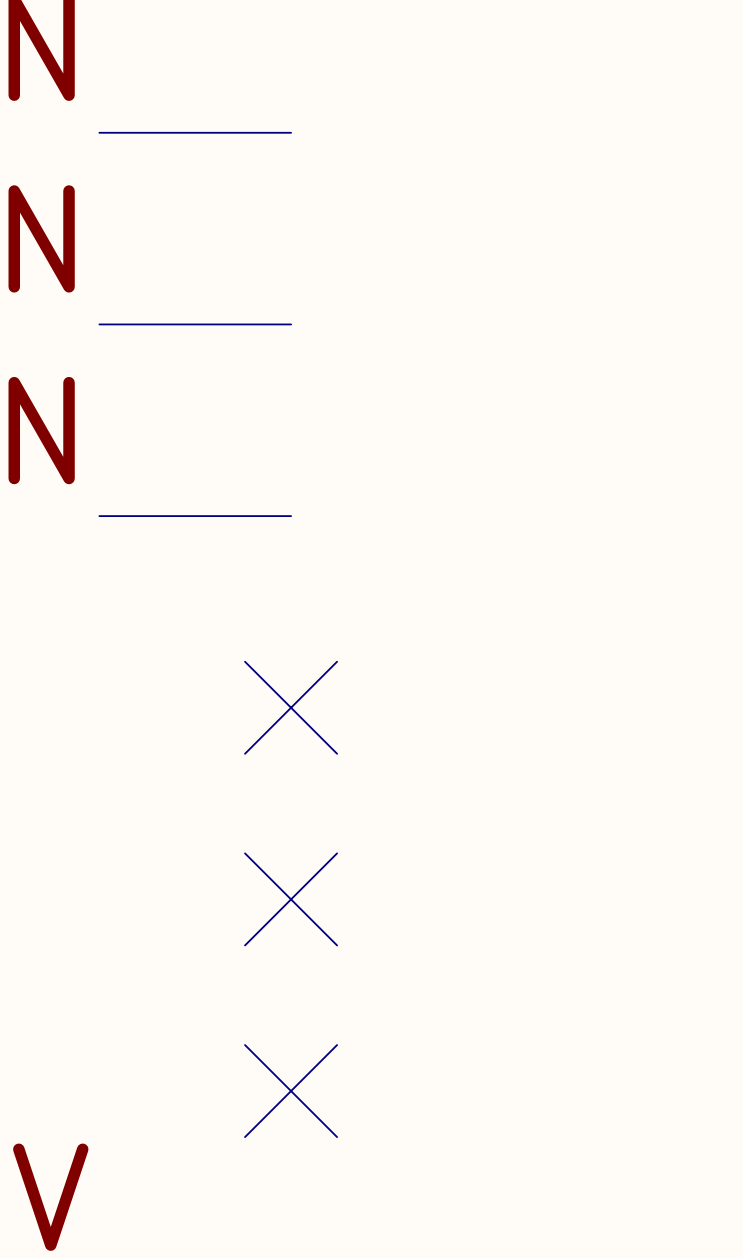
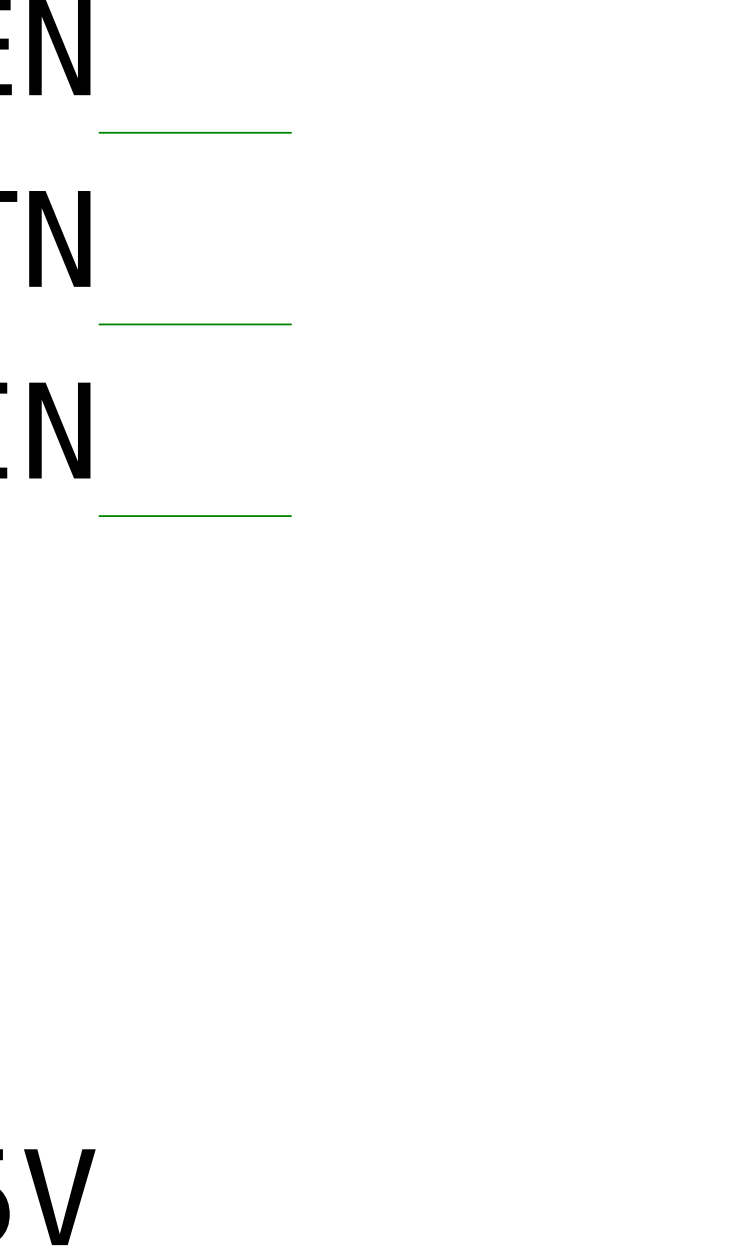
no-connect mark: (291, 707) -> none
no-connect mark: (291, 899) -> none
no-connect mark: (291, 1091) -> none

